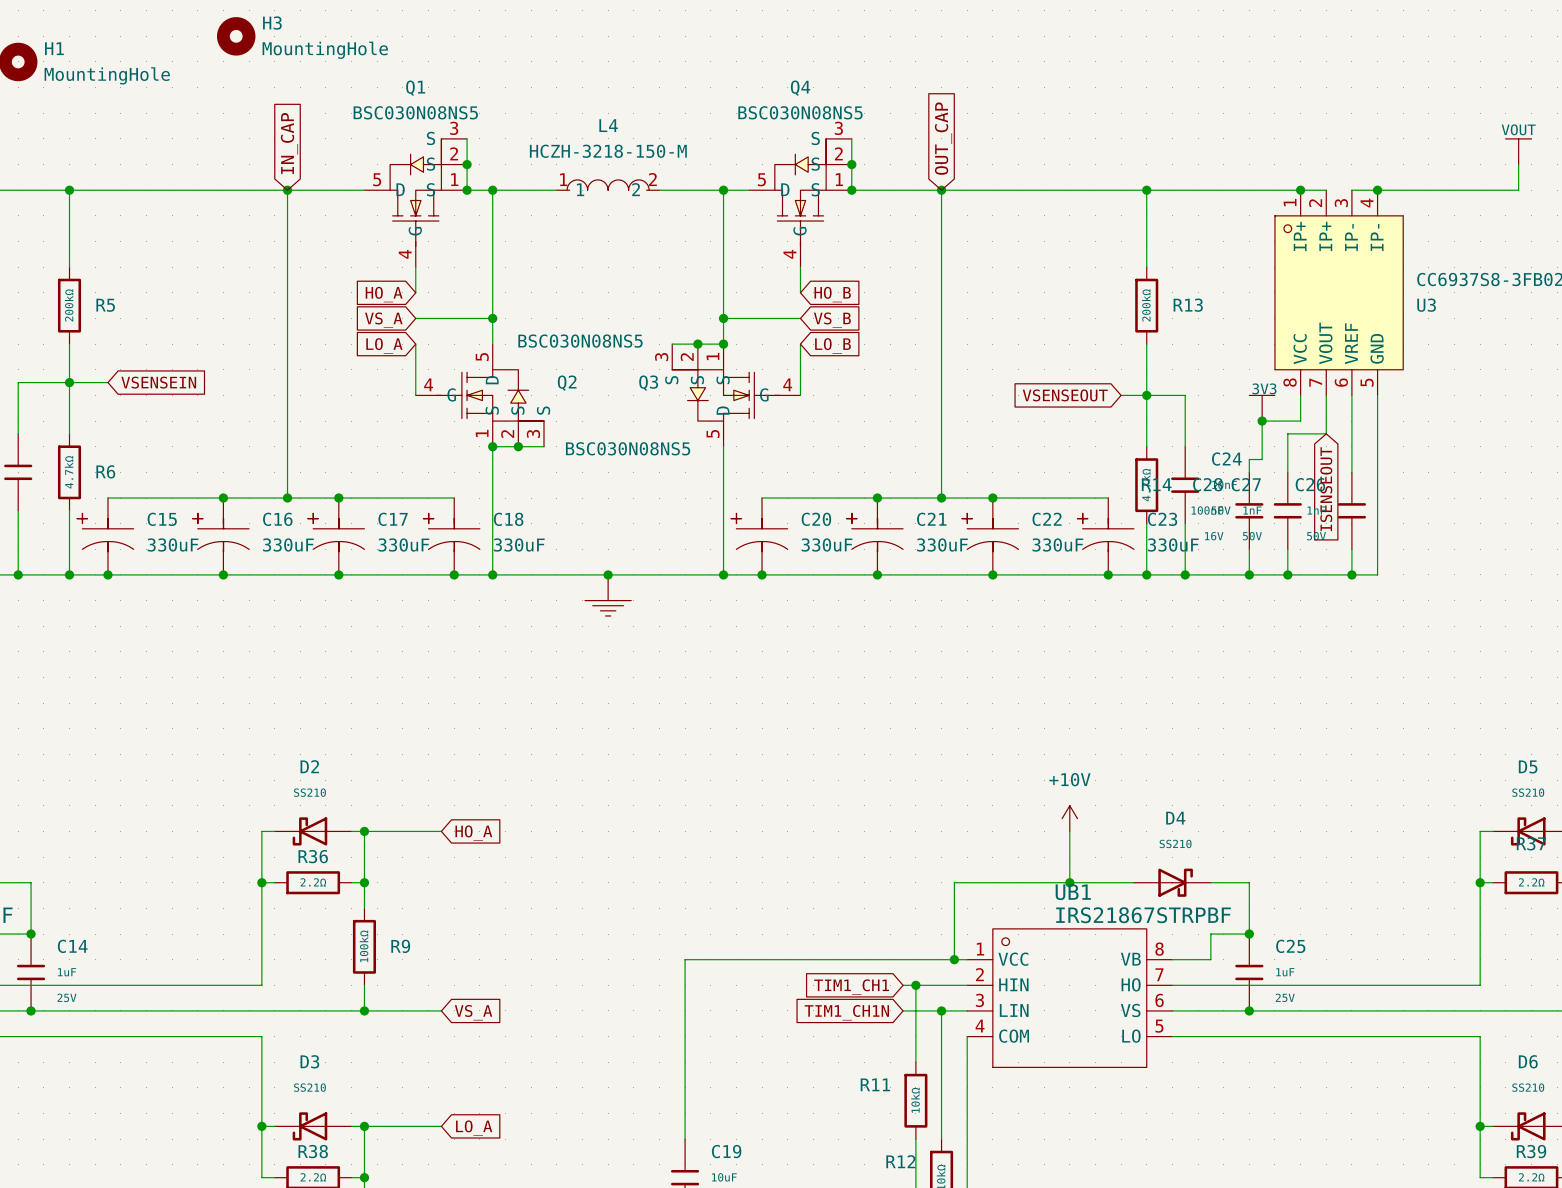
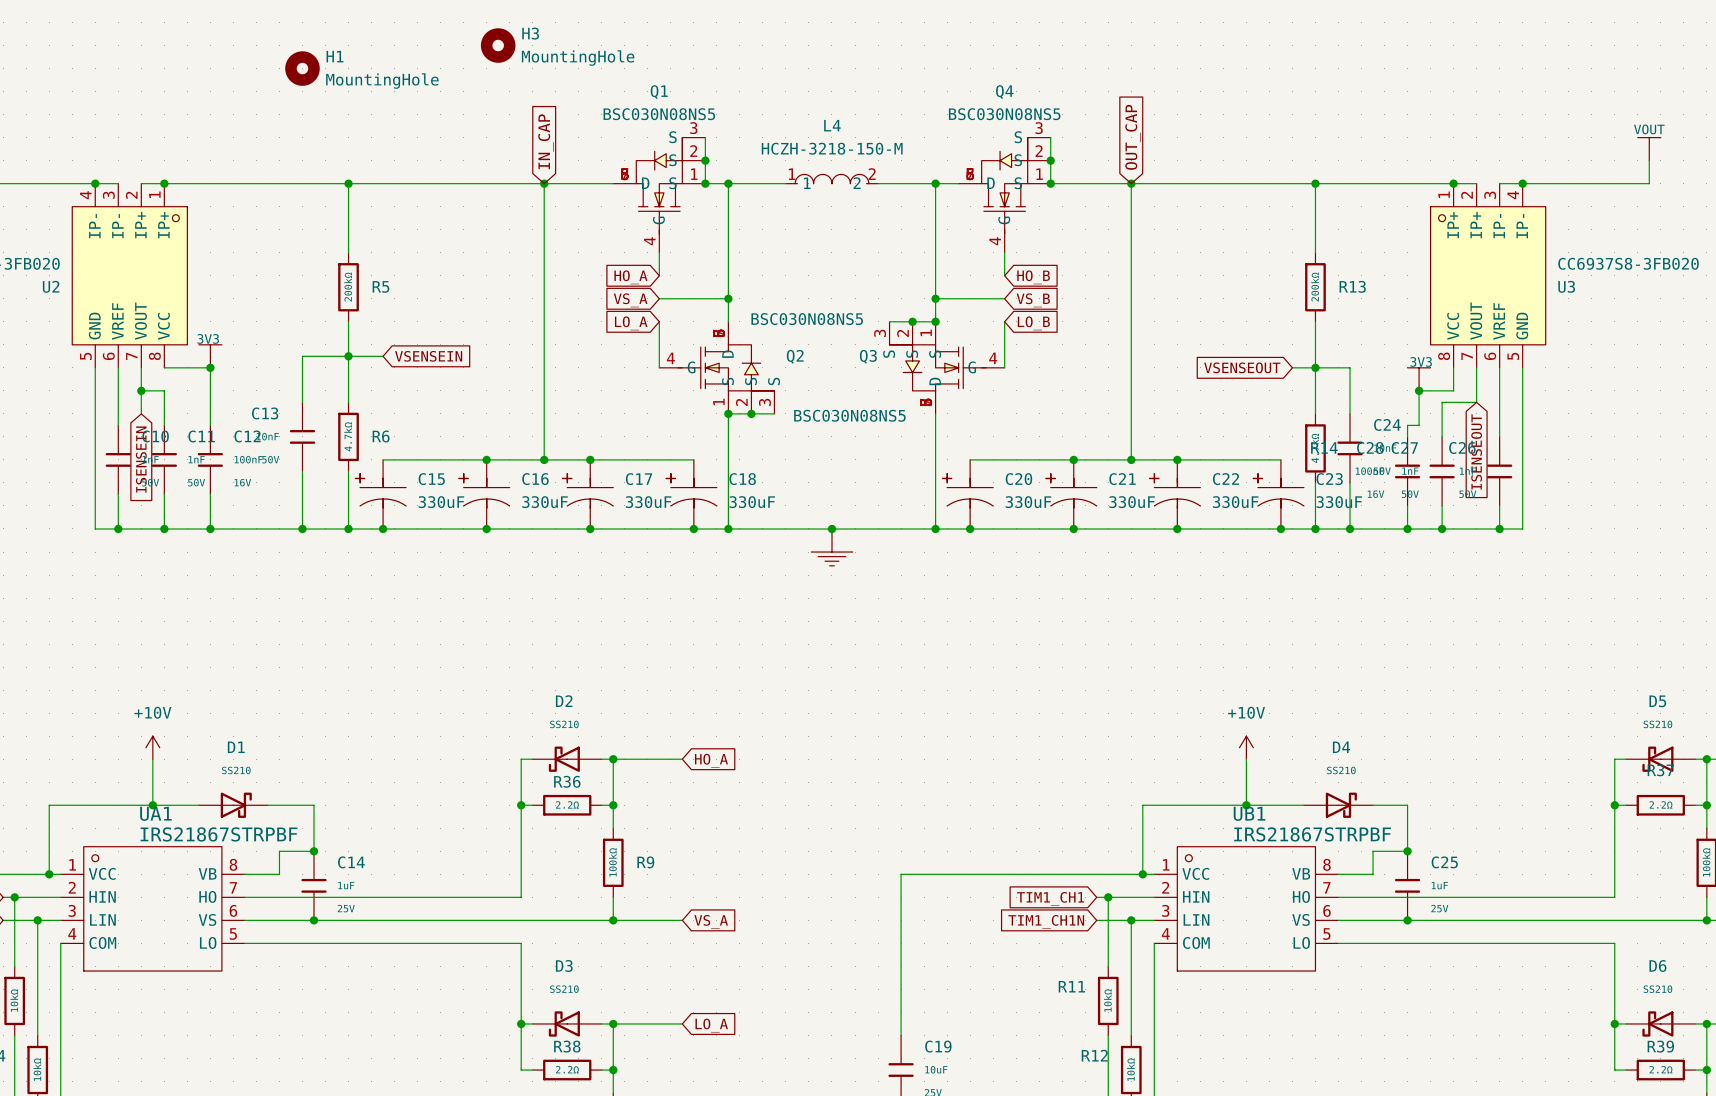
Q1 symbol: [364, 138, 468, 268] -> [613, 137, 706, 253]
Q4 symbol: [749, 138, 852, 268] -> [958, 137, 1051, 253]
Q2 symbol: [415, 344, 545, 447] -> [659, 321, 775, 414]
Q3 symbol: [672, 344, 801, 447] -> [889, 321, 1005, 414]

